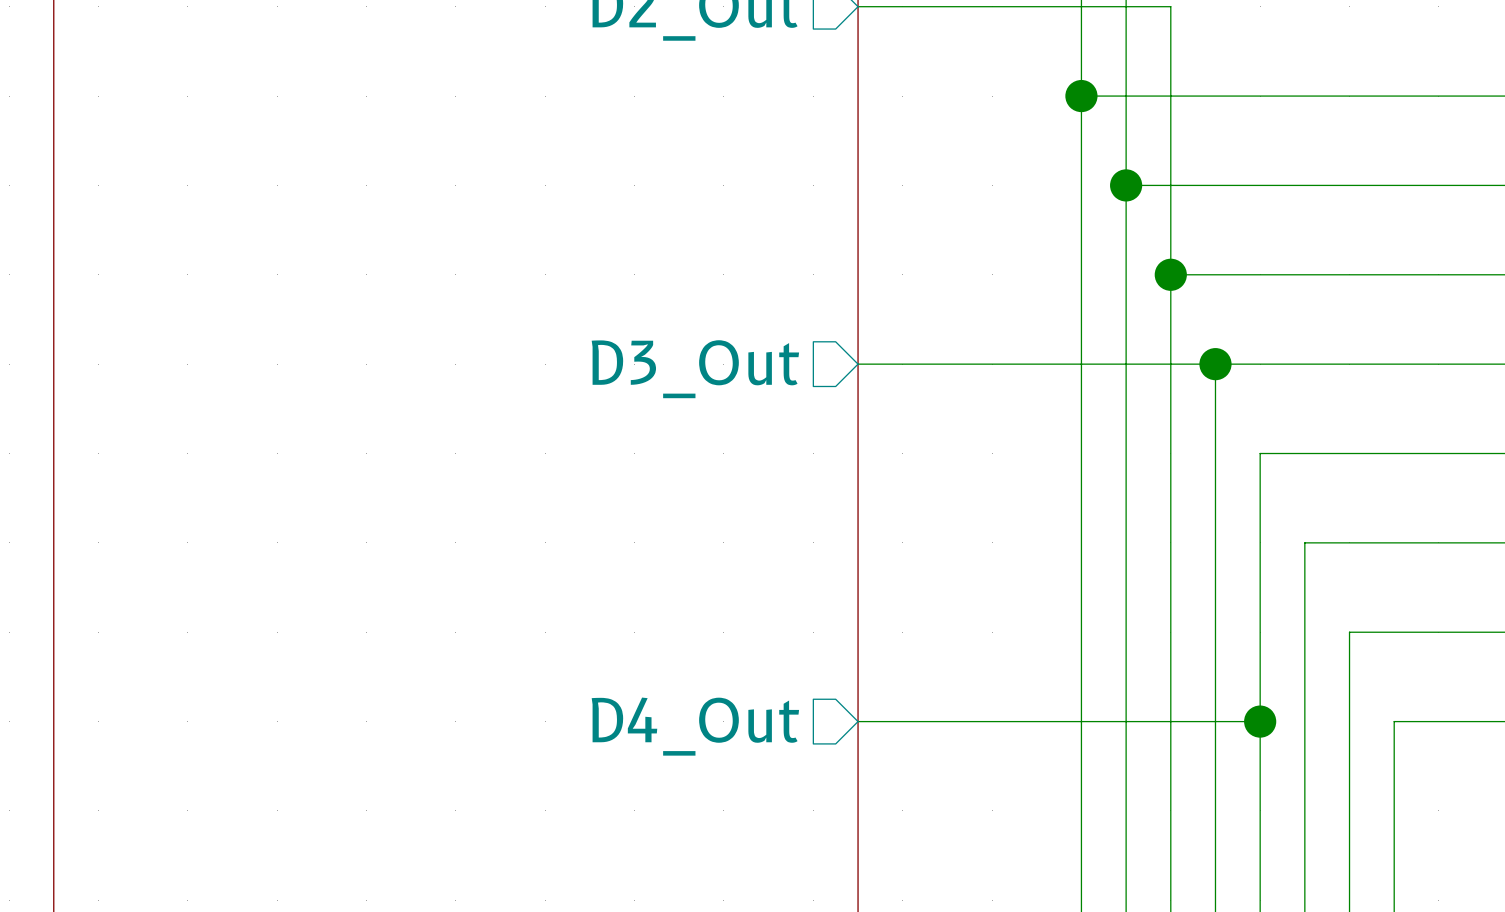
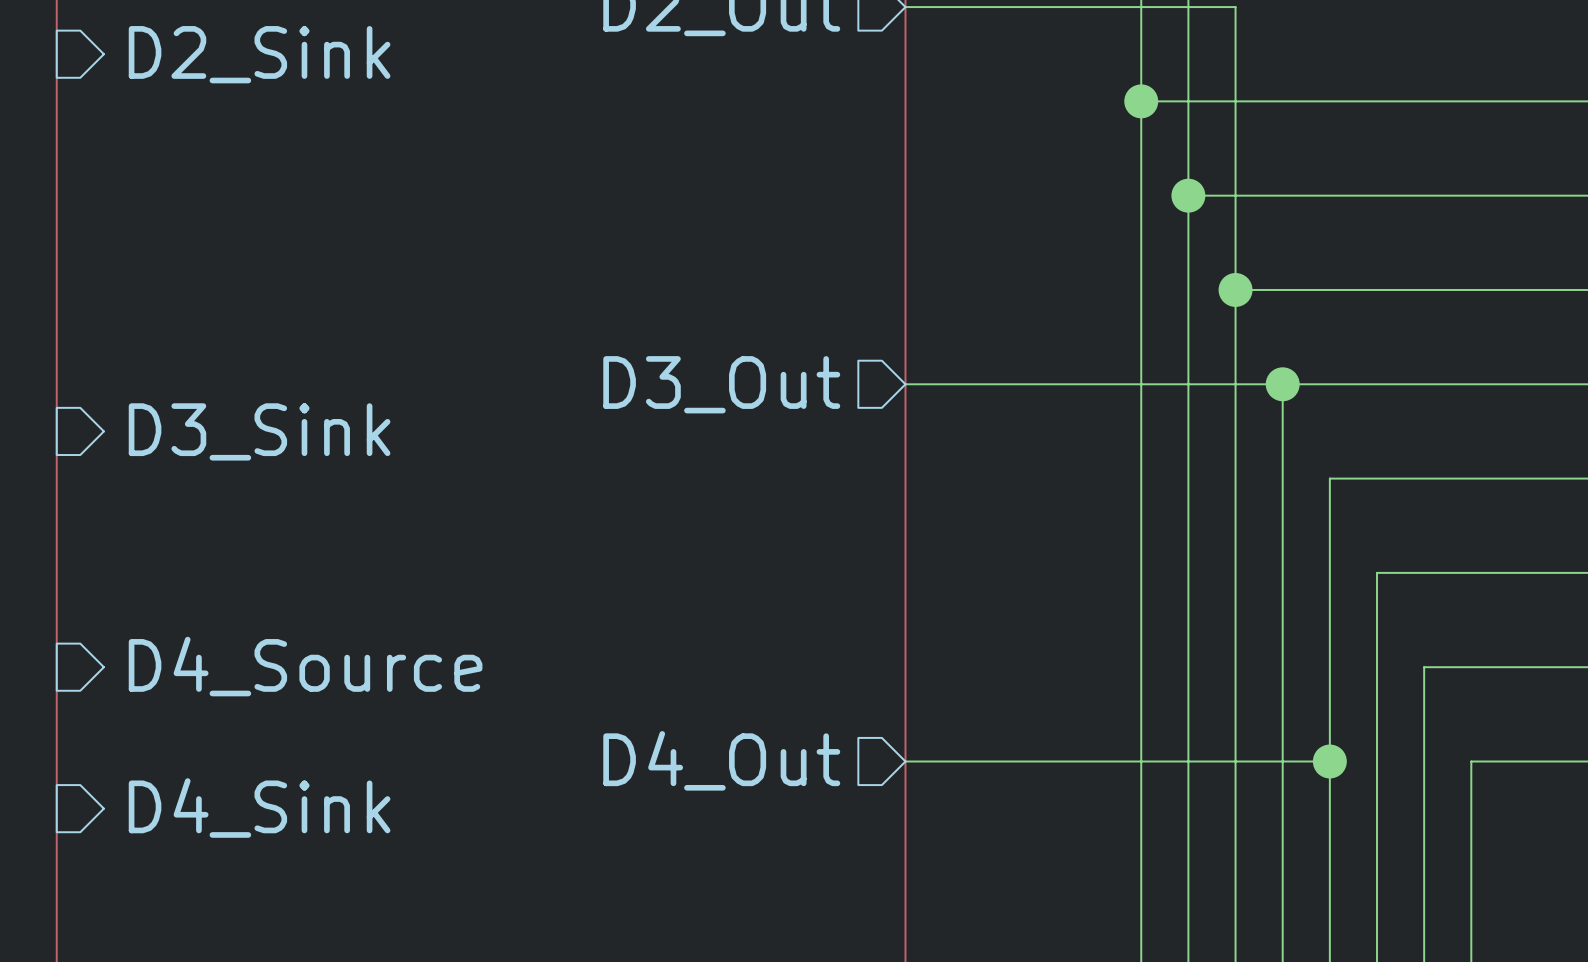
sheet pin: none -> D2_Sink (259, 54)
sheet pin: none -> D3_Sink (259, 431)
sheet pin: none -> D4_Source (305, 666)
sheet pin: none -> D4_Sink (259, 808)

